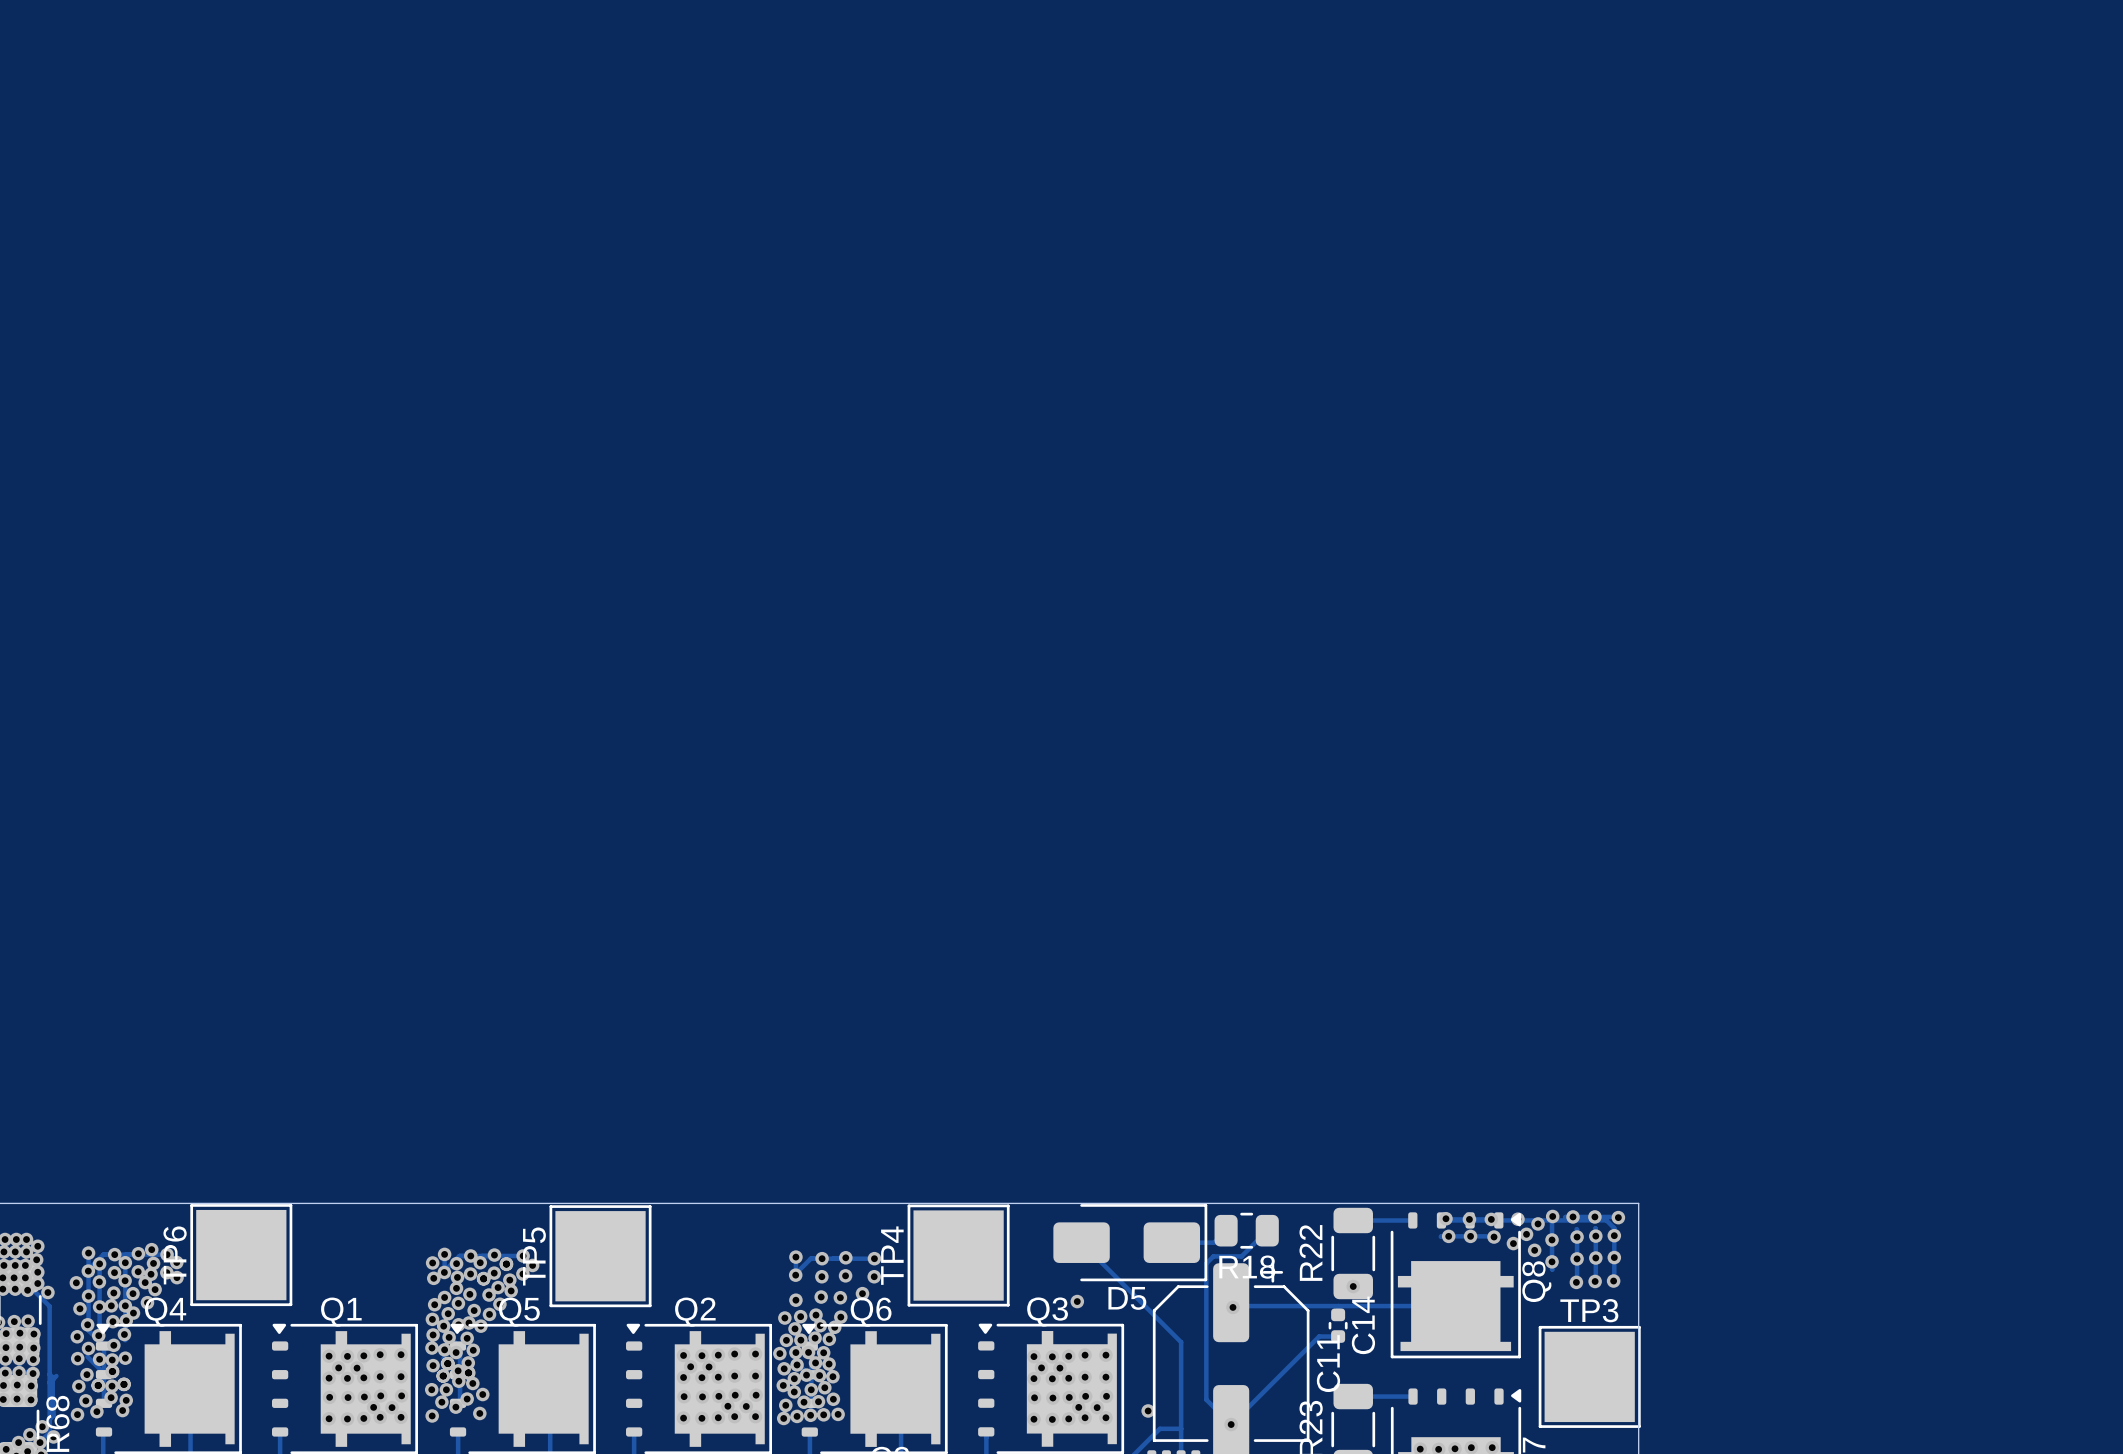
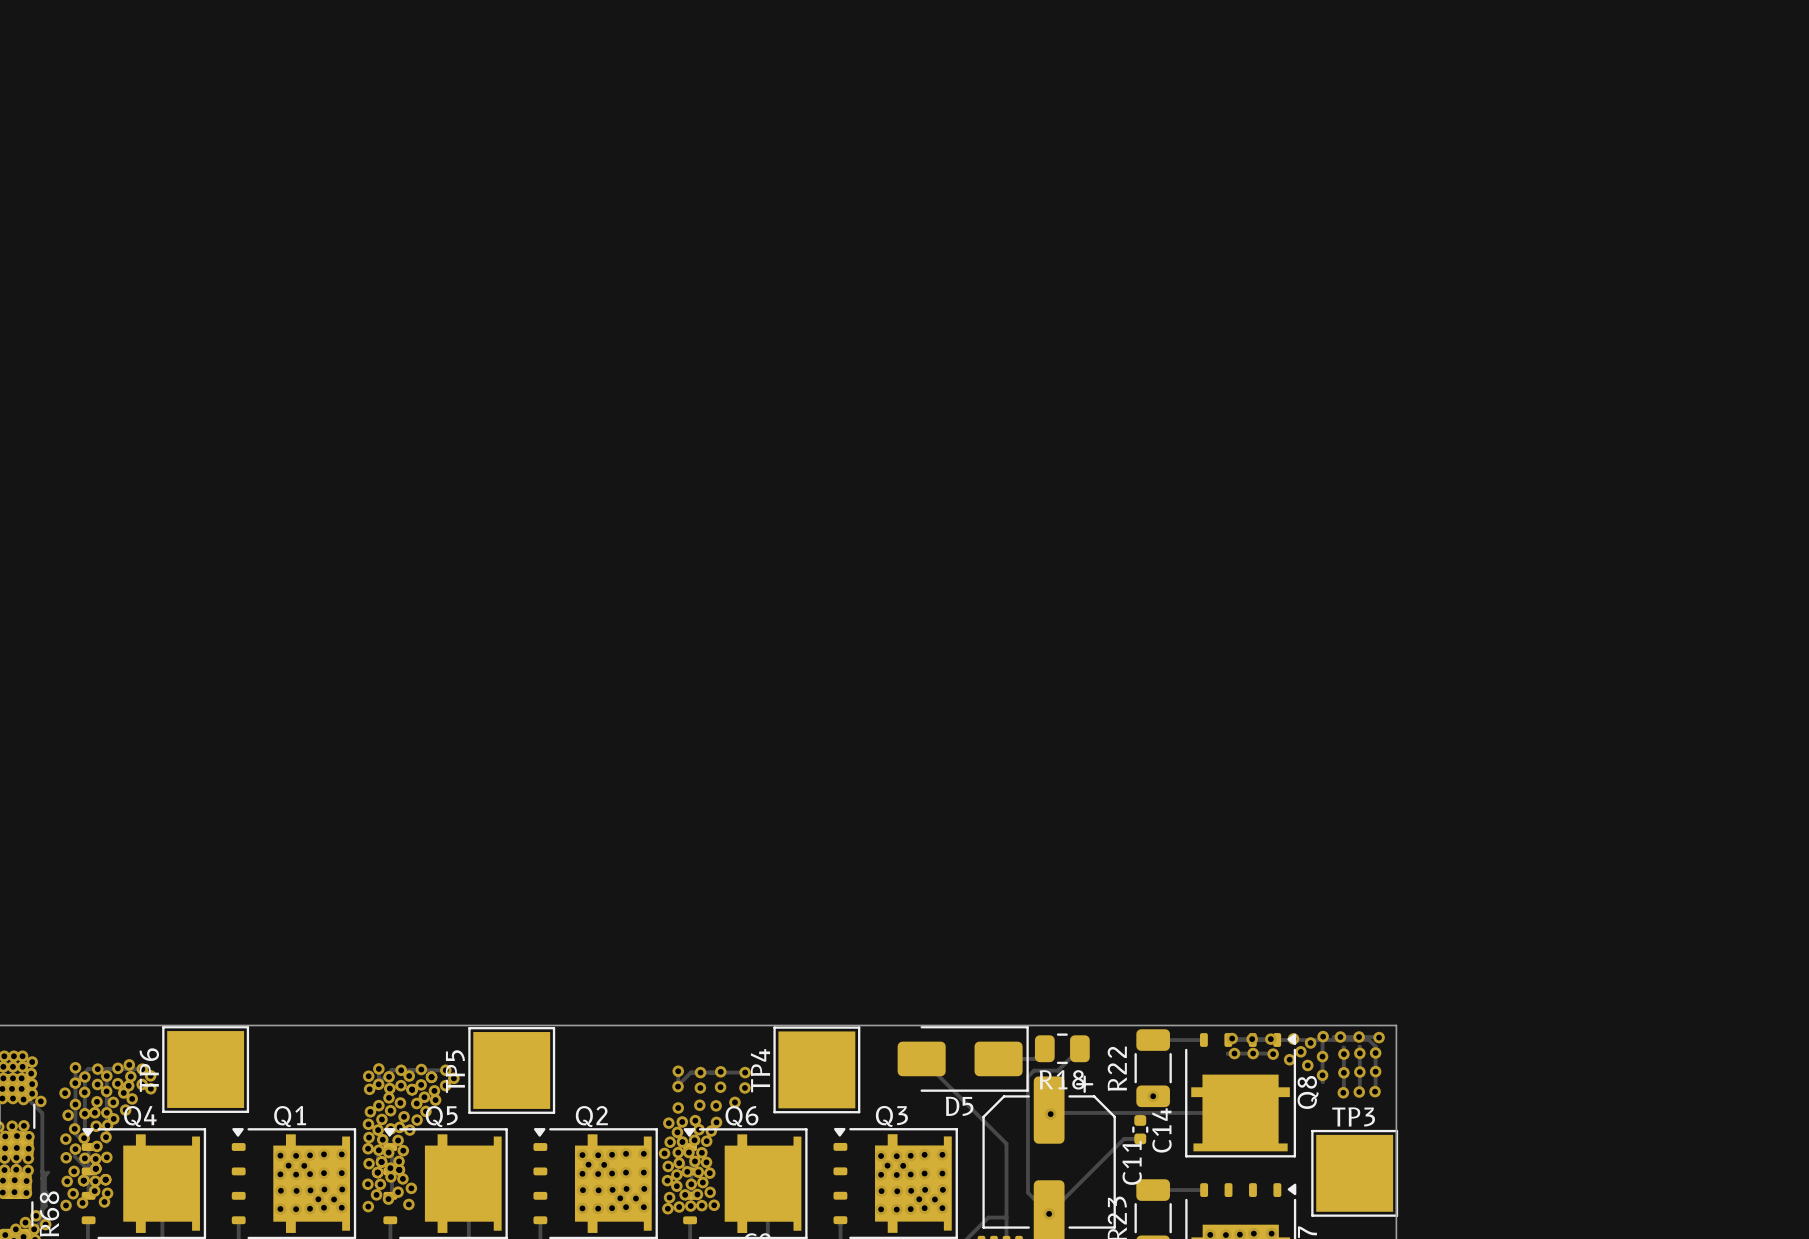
via: (1077, 1301) -> none
via: (1148, 1410) -> none

